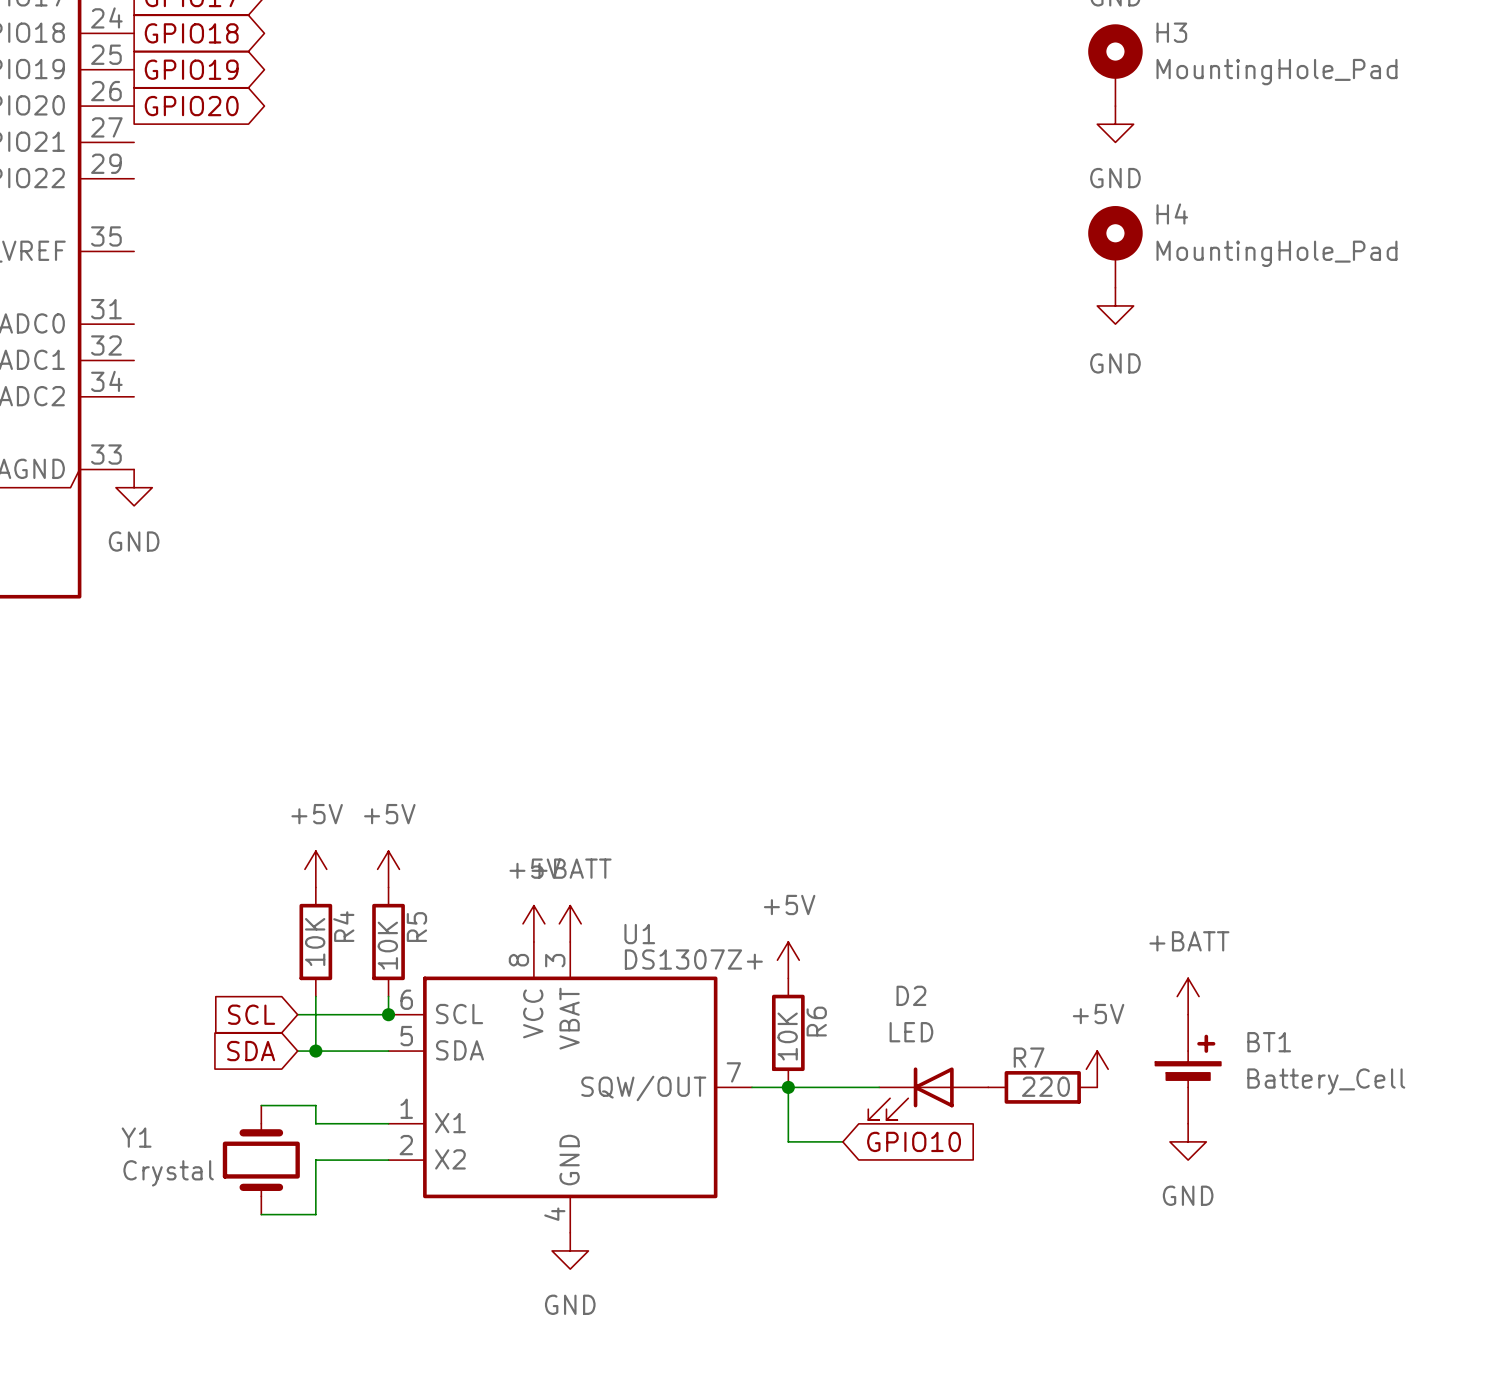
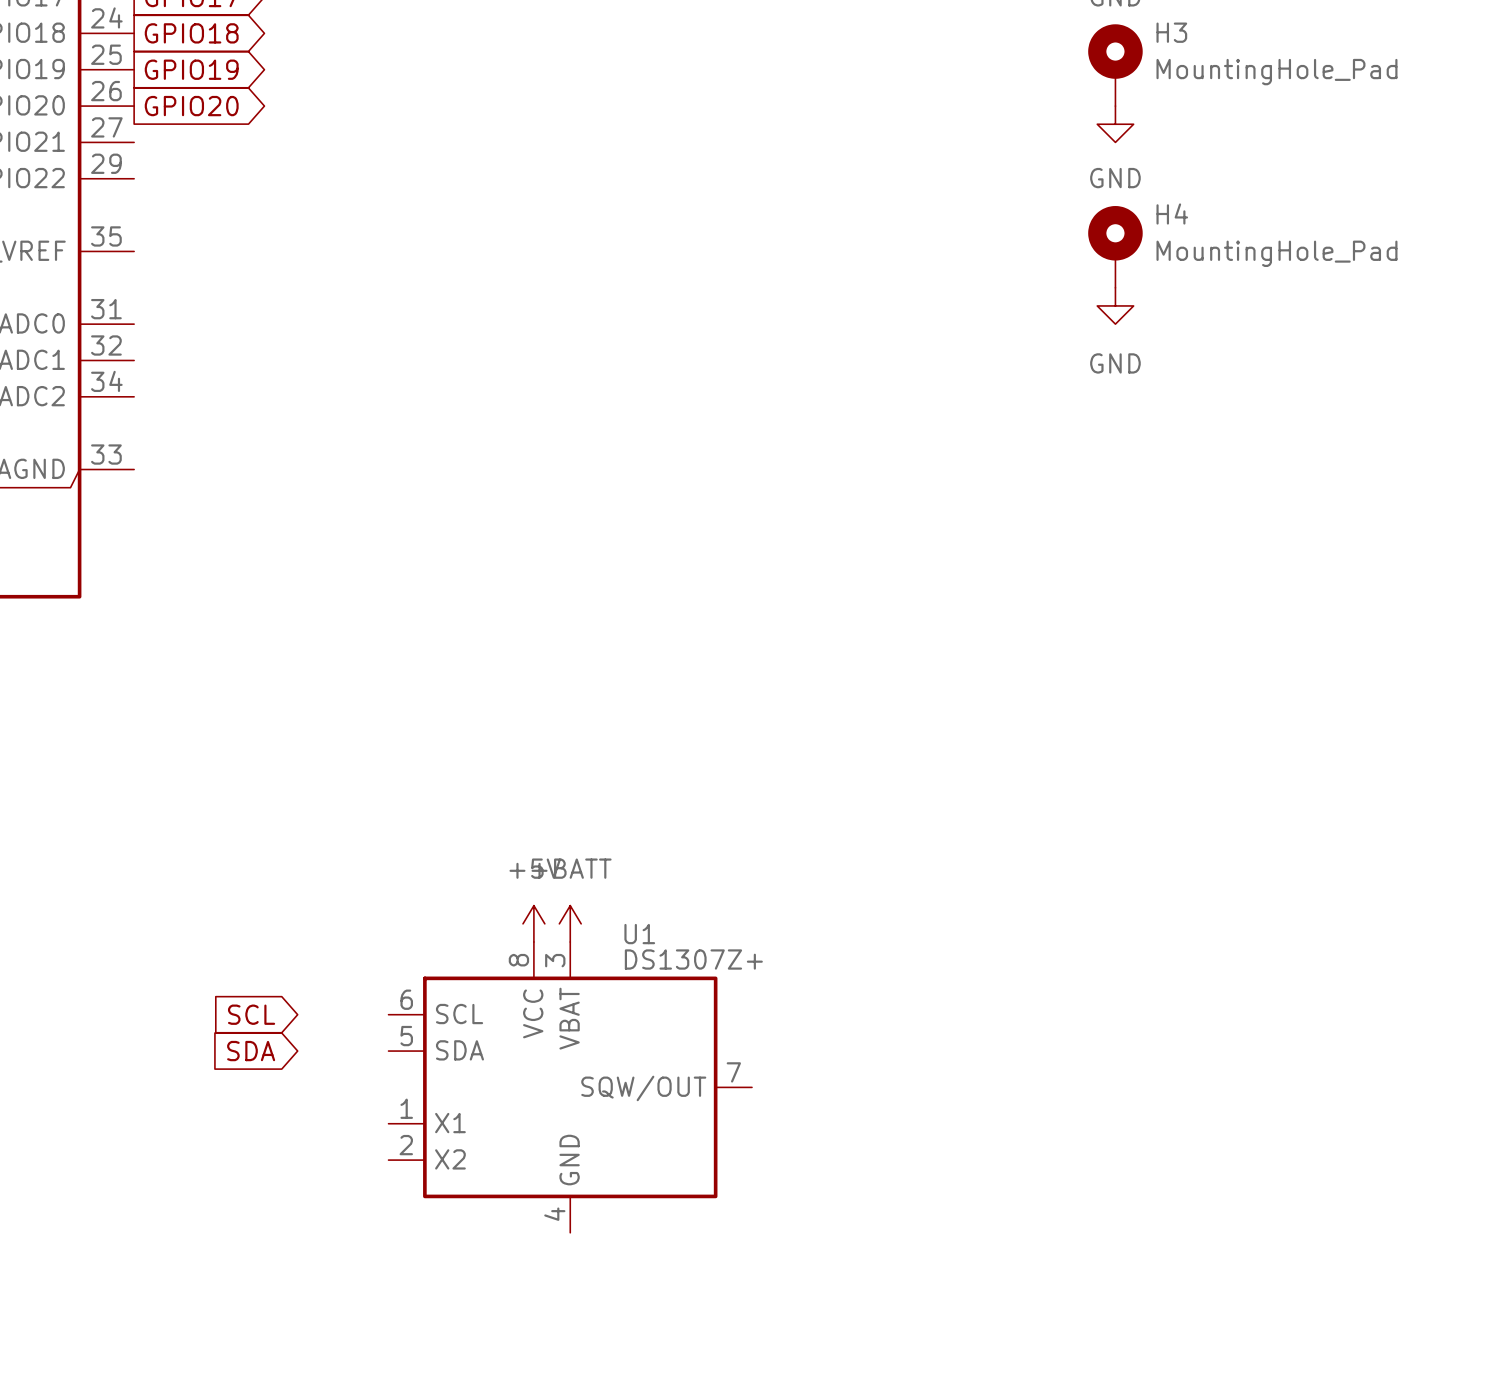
power symbol: GND (134, 487) -> none
power symbol: +5V (315, 869) -> none
power symbol: +5V (388, 869) -> none
R4: 10K (315, 942) -> none
R5: 10K (388, 942) -> none
power symbol: +5V (788, 960) -> none
wire: (315, 996) (315, 1051) -> none
wire: (388, 996) (388, 1014) (297, 1014) -> none
power symbol: +BATT (1188, 996) -> none
junction: (388, 1014) -> none
R6: 10K (788, 1032) -> none
wire: (297, 1051) (388, 1051) -> none
junction: (315, 1051) -> none
power symbol: +5V (1097, 1069) -> none
BT1: Battery_Cell (1188, 1069) -> none
wire: (751, 1087) (879, 1087) -> none
wire: (788, 1087) (788, 1141) (842, 1141) -> none
junction: (788, 1087) -> none
R7: 220 (1042, 1087) -> none
D2: LED (928, 1093) -> none
wire: (261, 1105) (315, 1105) (315, 1123) (388, 1123) -> none
global label: GPIO10 (914, 1141) -> none
power symbol: GND (1188, 1141) -> none
Y1: Crystal (261, 1160) -> none
wire: (388, 1160) (315, 1160) (315, 1214) (261, 1214) -> none
power symbol: GND (570, 1250) -> none

